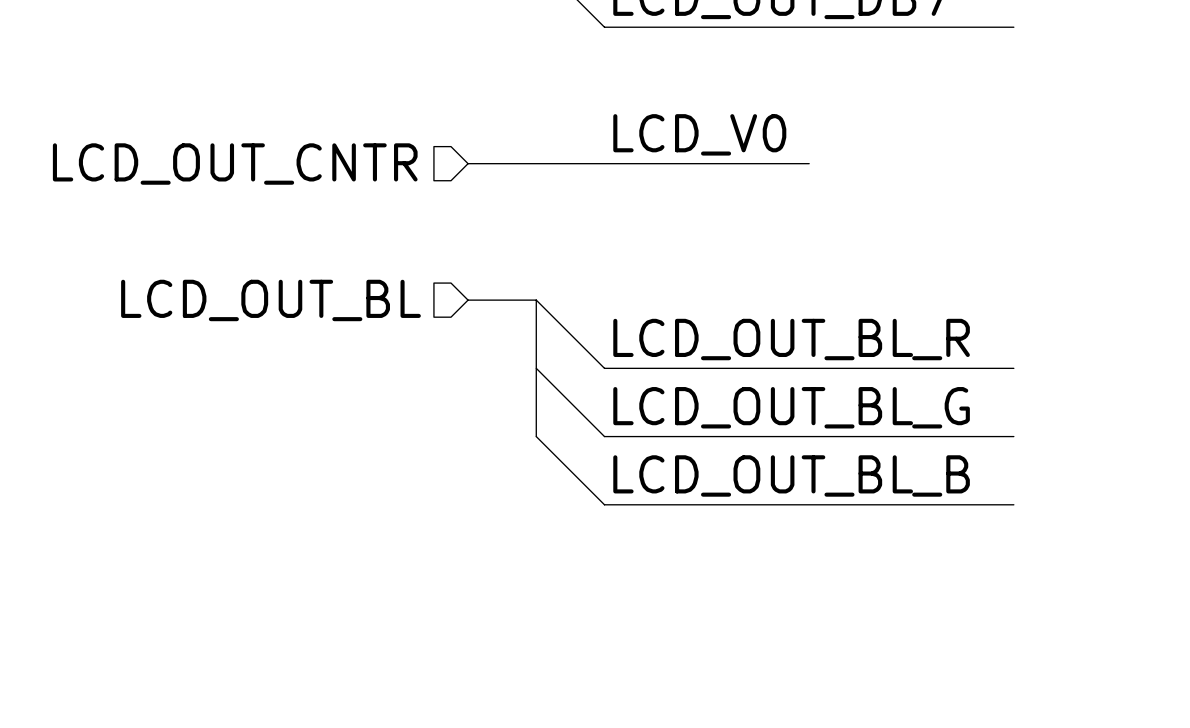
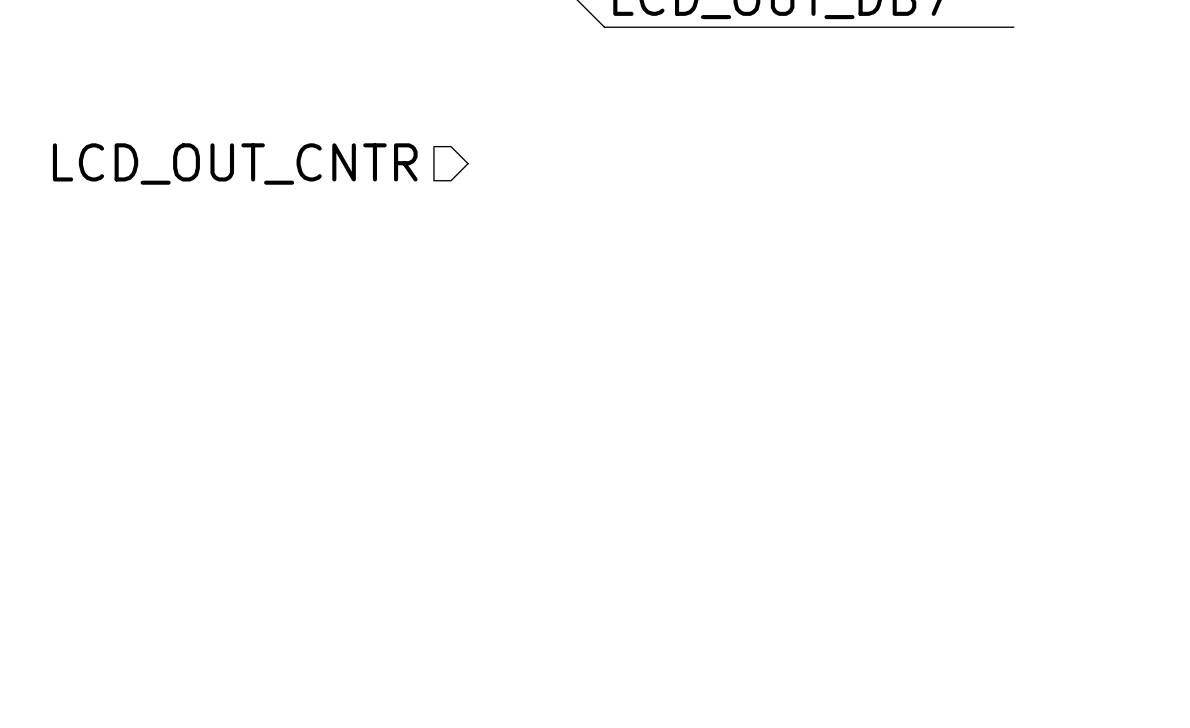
label: LCD_V0 (699, 134) -> none
wire: (468, 163) (809, 163) -> none
hierarchical label: LCD_OUT_BL (270, 300) -> none
bus: (468, 300) (536, 300) (536, 436) -> none
wire: (536, 300) (604, 368) (1013, 368) -> none
label: LCD_OUT_BL_R (791, 339) -> none
wire: (536, 368) (604, 436) (1013, 436) -> none
label: LCD_OUT_BL_G (791, 407) -> none
wire: (536, 436) (604, 504) (1013, 504) -> none
label: LCD_OUT_BL_B (791, 475) -> none

